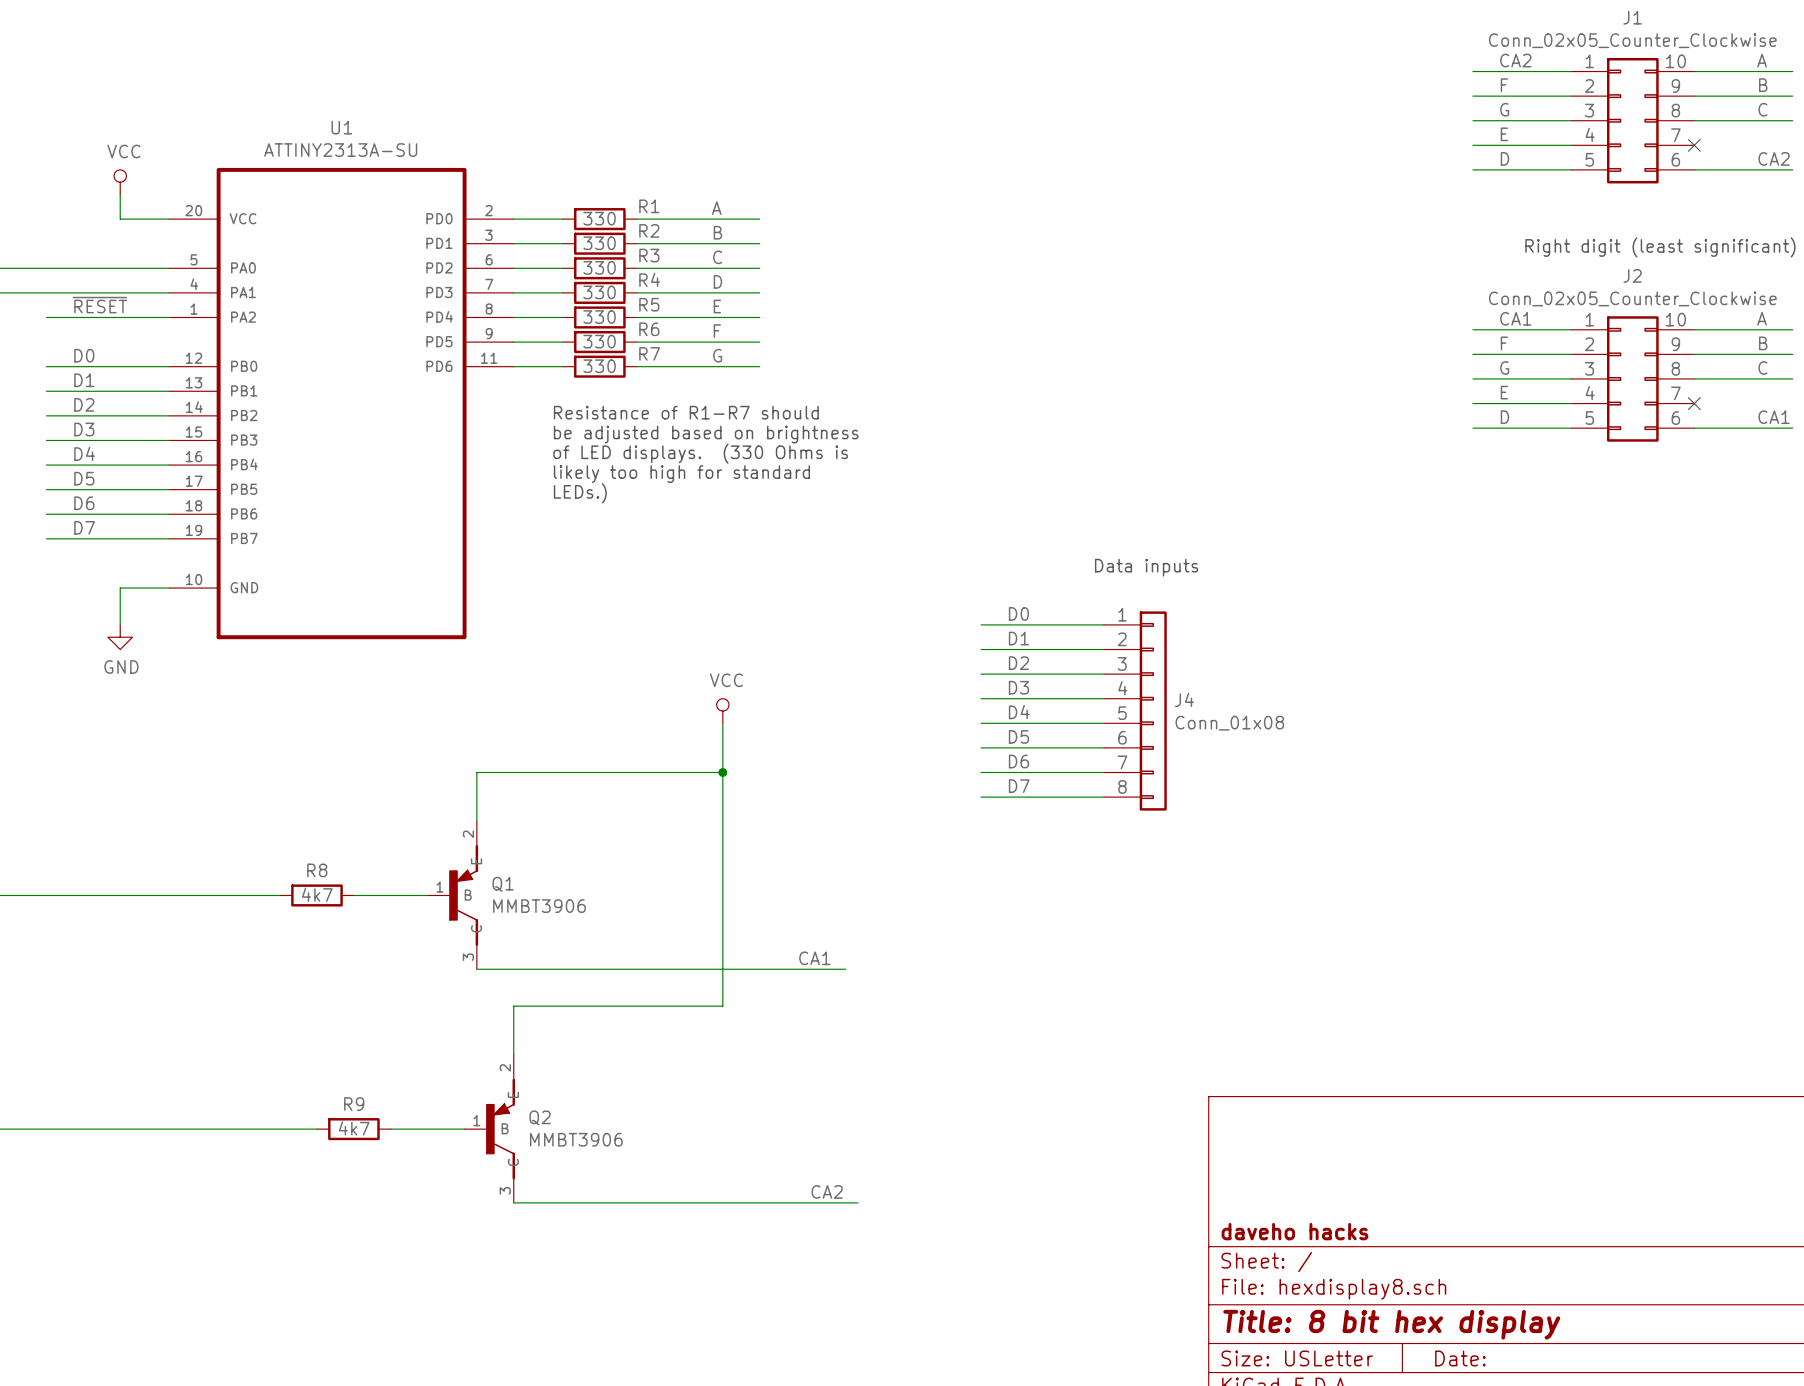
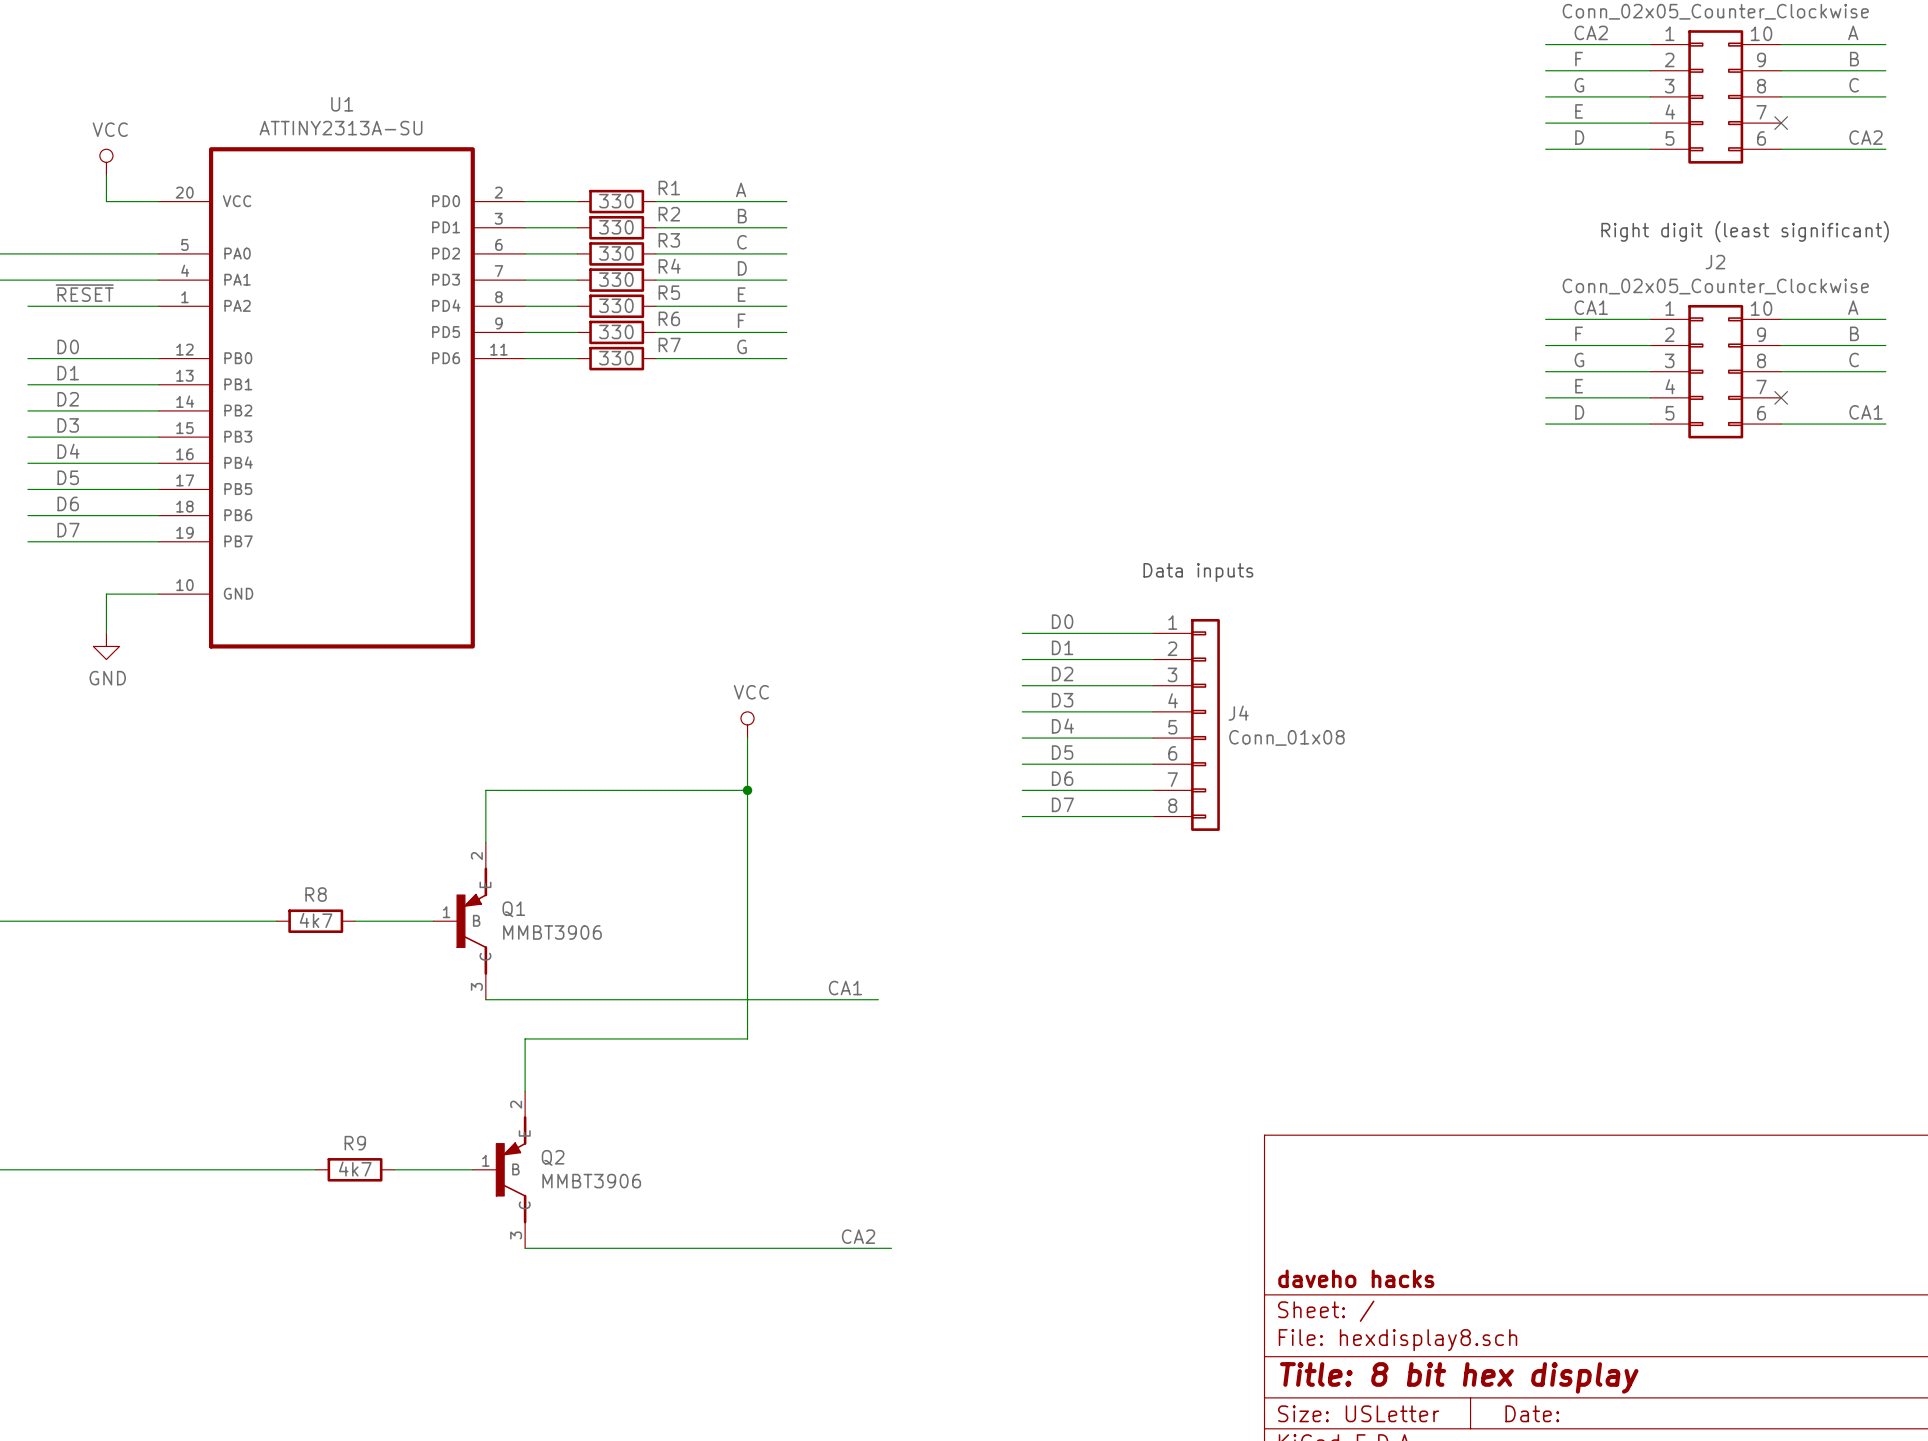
text: Resistance of R1-R7 should (686, 412) -> none
text: be adjusted based on brightness (706, 434) -> none
text: of LED displays. (330 Ohms is (700, 453) -> none
text: likely too high for standard (681, 474) -> none
text: LEDs.) (580, 493) -> none

